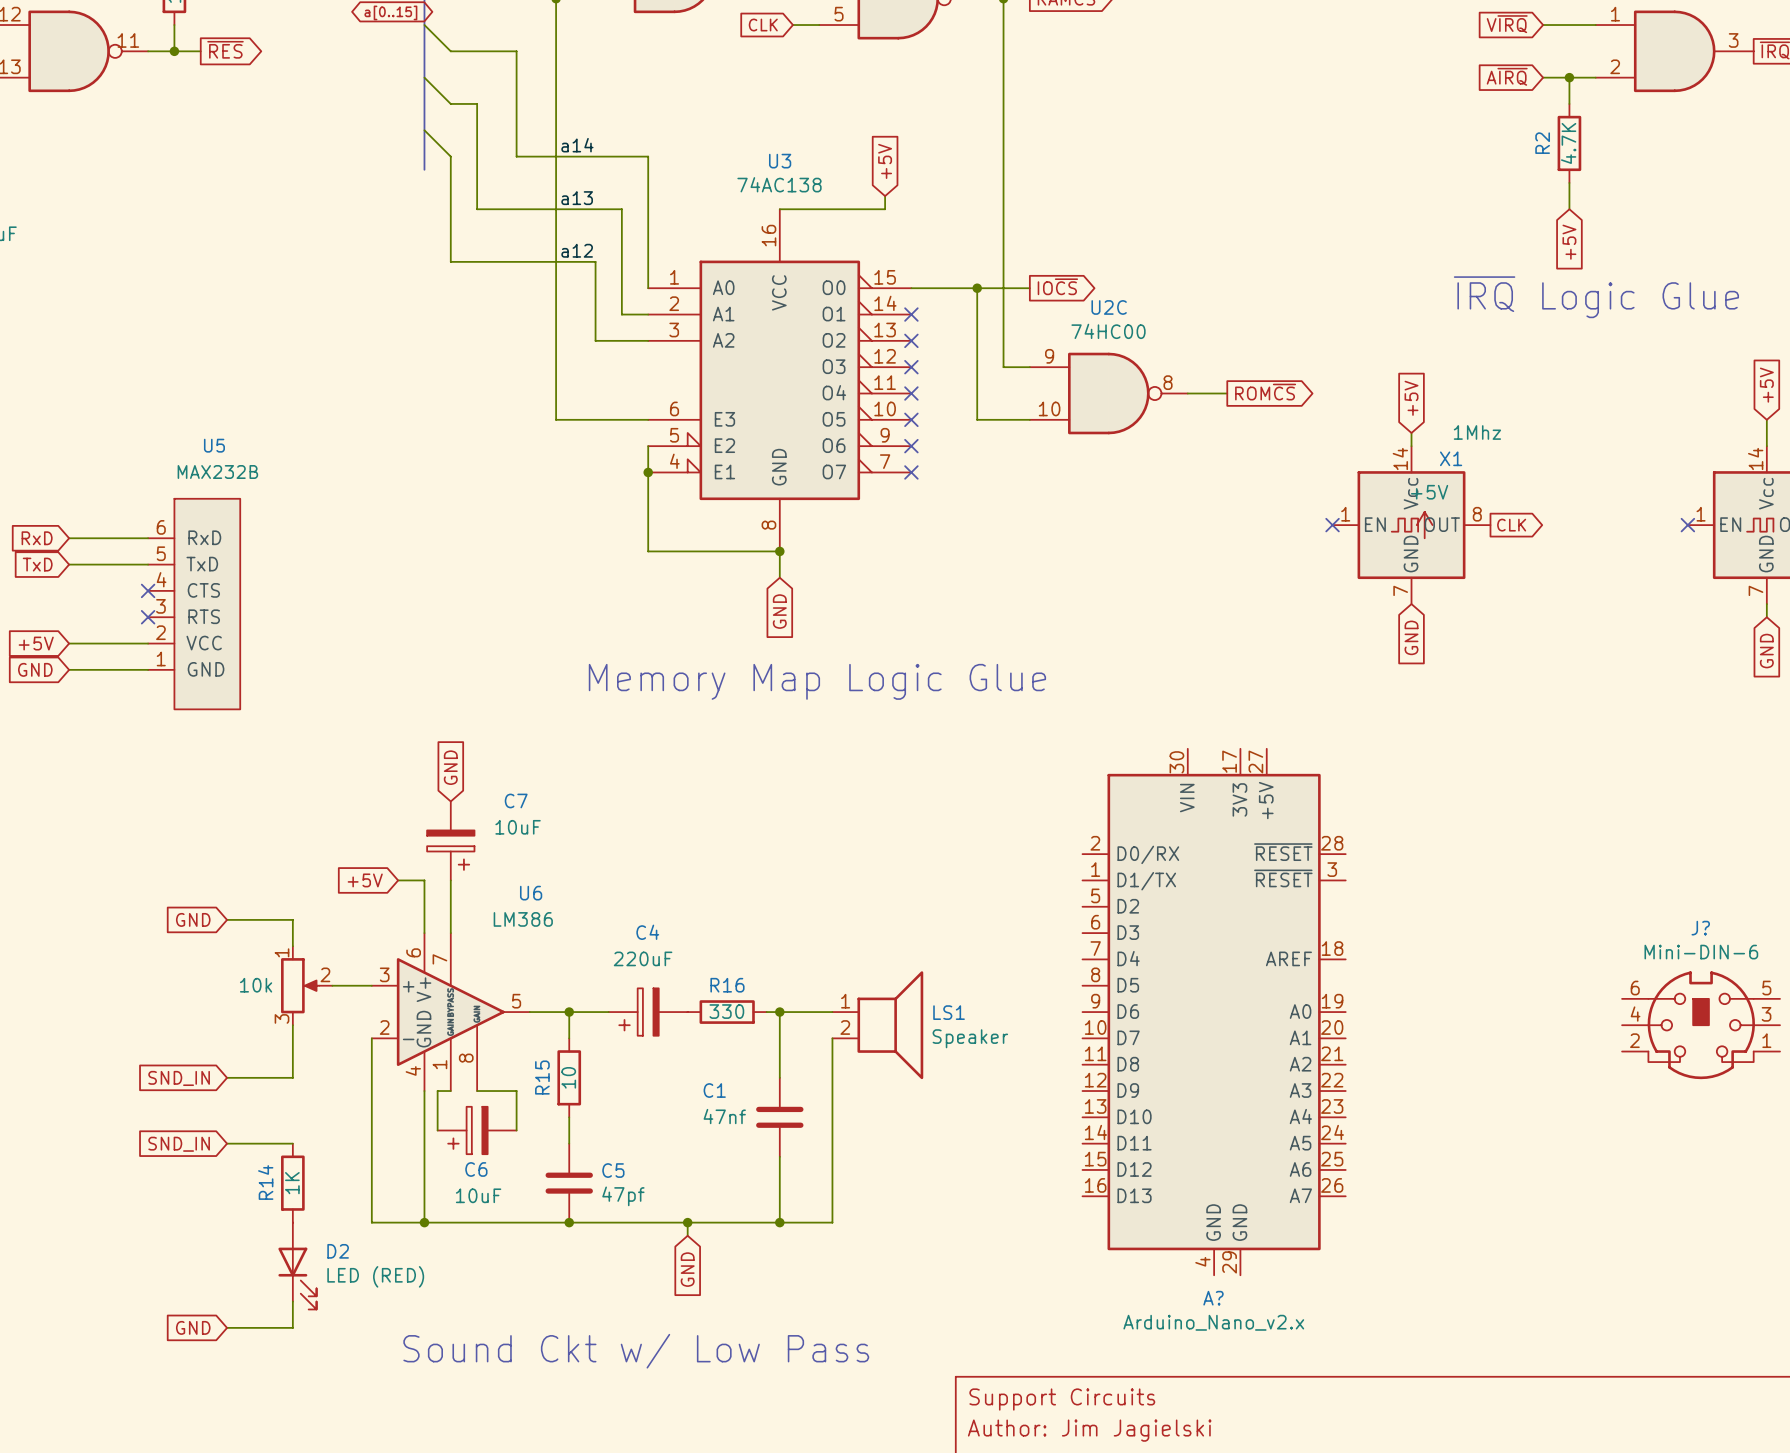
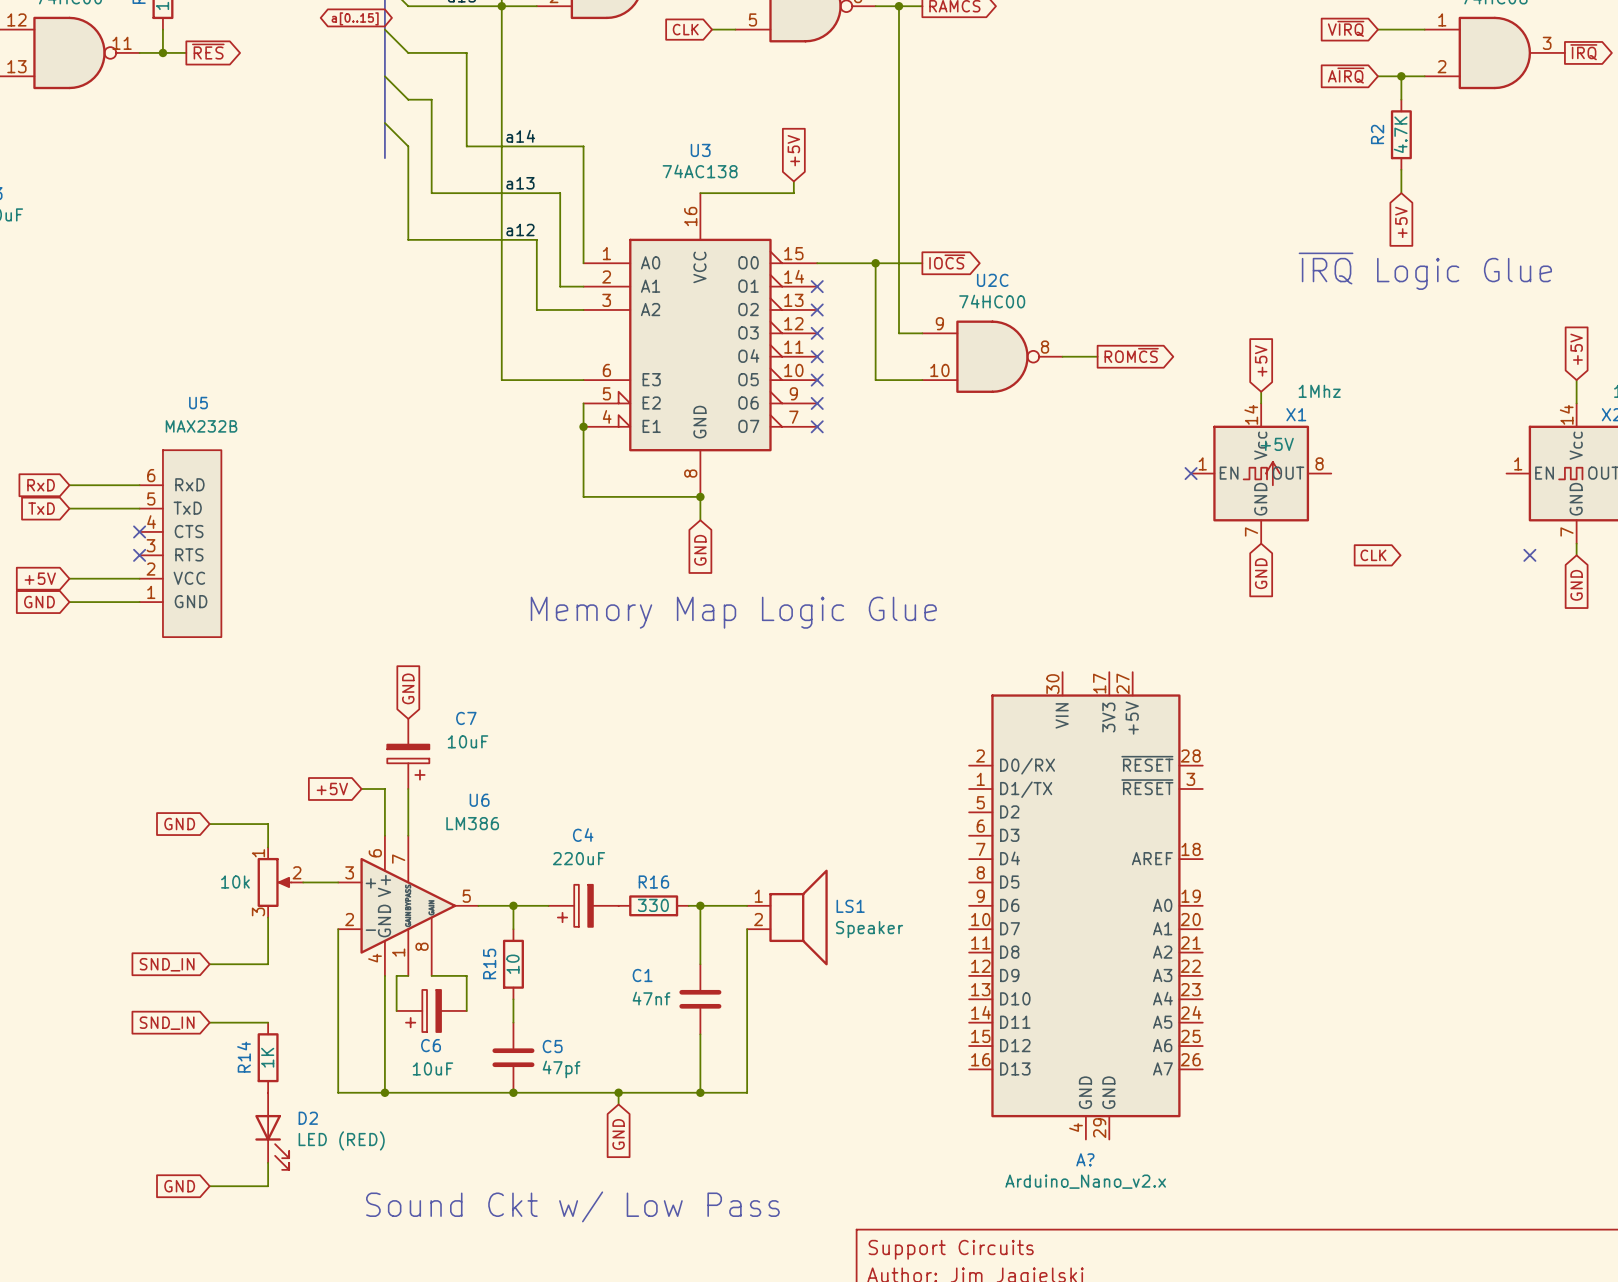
global label position: CLK (1511, 525) -> CLK (1373, 555)
no-connect mark: (1687, 525) -> none
no-connect mark: none -> (1529, 555)
J?: Mini-DIN-6 (1701, 1025) -> none

